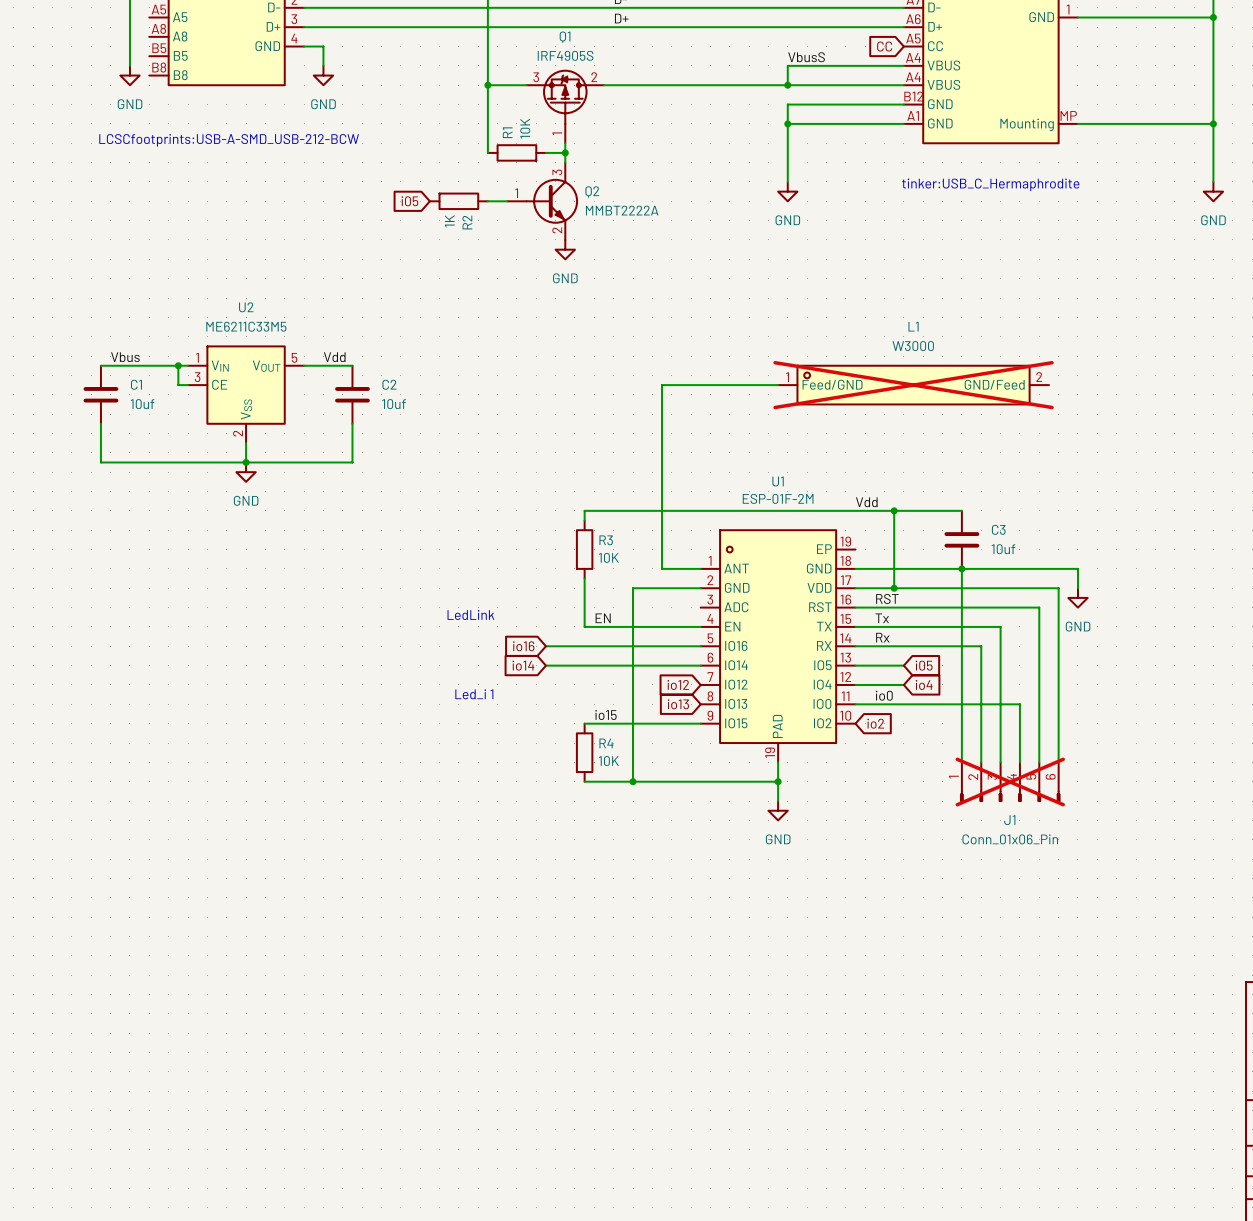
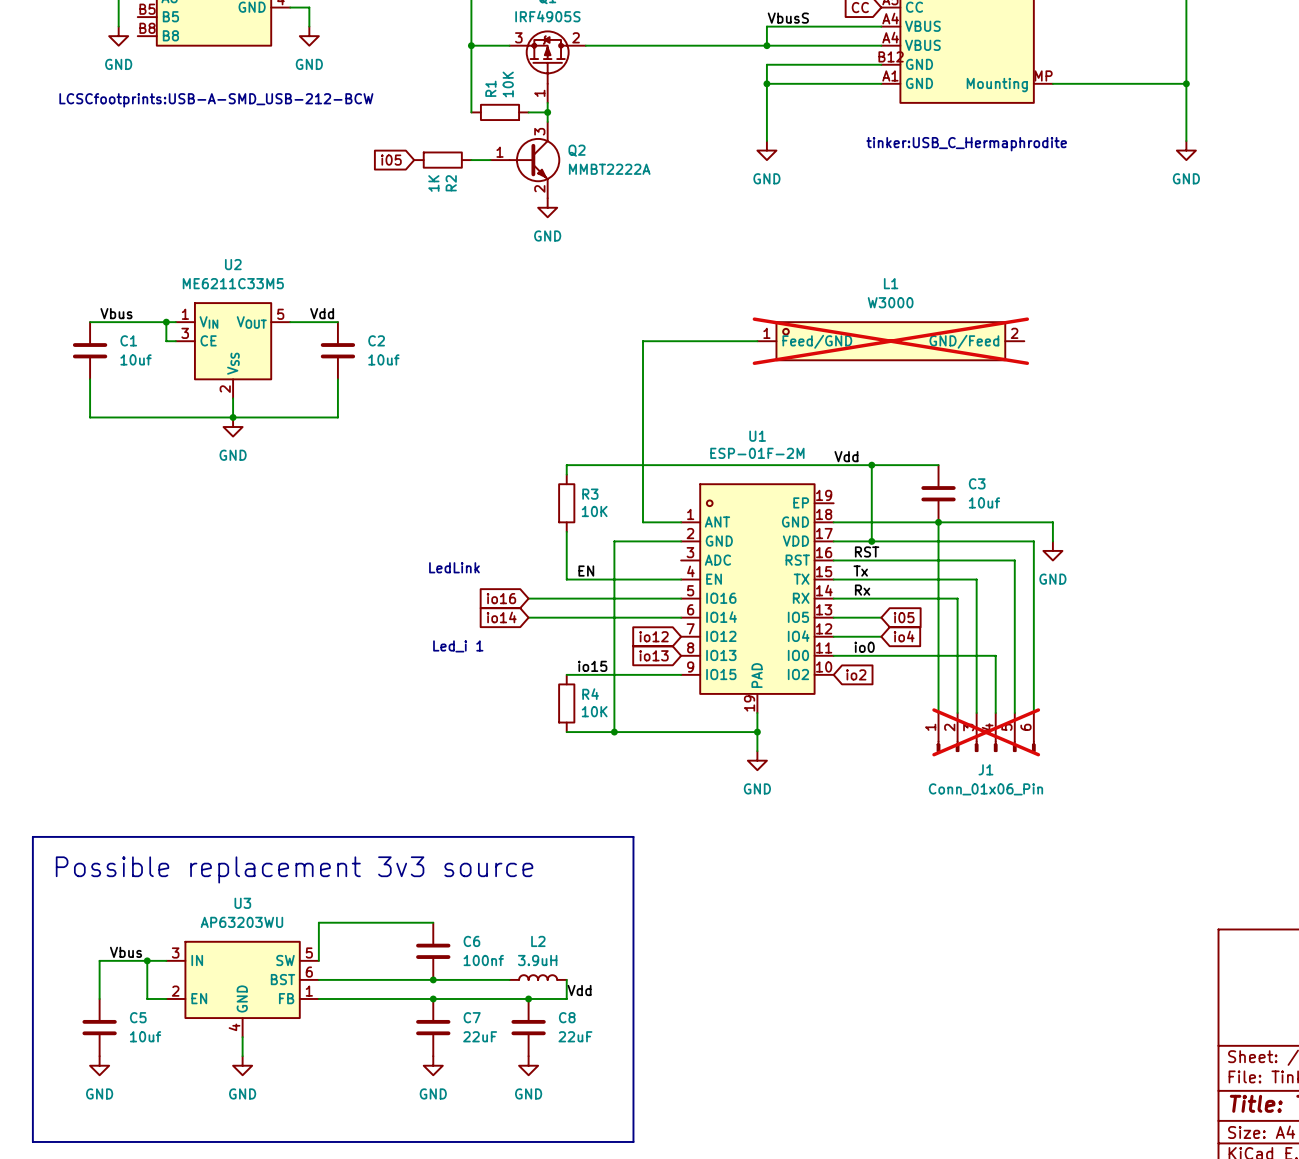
line: none -> (32, 836) (633, 836) (633, 1141) (32, 1141) (32, 836)
text: none -> Possible replacement 3v3 source (294, 869)
wire: none -> (433, 922) (318, 922) (318, 960)
C6: none -> 100nf (433, 951)
label: none -> Vbus (126, 952)
wire: none -> (147, 960) (147, 998) (166, 998)
junction: none -> (147, 960)
wire: none -> (166, 960) (99, 960) (99, 998)
L2: none -> 3.9uH (538, 977)
wire: none -> (318, 979) (509, 979)
junction: none -> (433, 979)
wire: none -> (566, 979) (566, 998) (318, 998)
U3: none -> AP63203WU (242, 988)
label: none -> Vdd (579, 990)
junction: none -> (433, 998)
junction: none -> (528, 998)
C5: none -> 10uf (99, 1027)
C7: none -> 22uF (433, 1027)
C8: none -> 22uF (528, 1027)
wire: none -> (242, 1037) (242, 1056)
power symbol: none -> GND (99, 1065)
power symbol: none -> GND (242, 1065)
power symbol: none -> GND (433, 1065)
power symbol: none -> GND (528, 1065)

